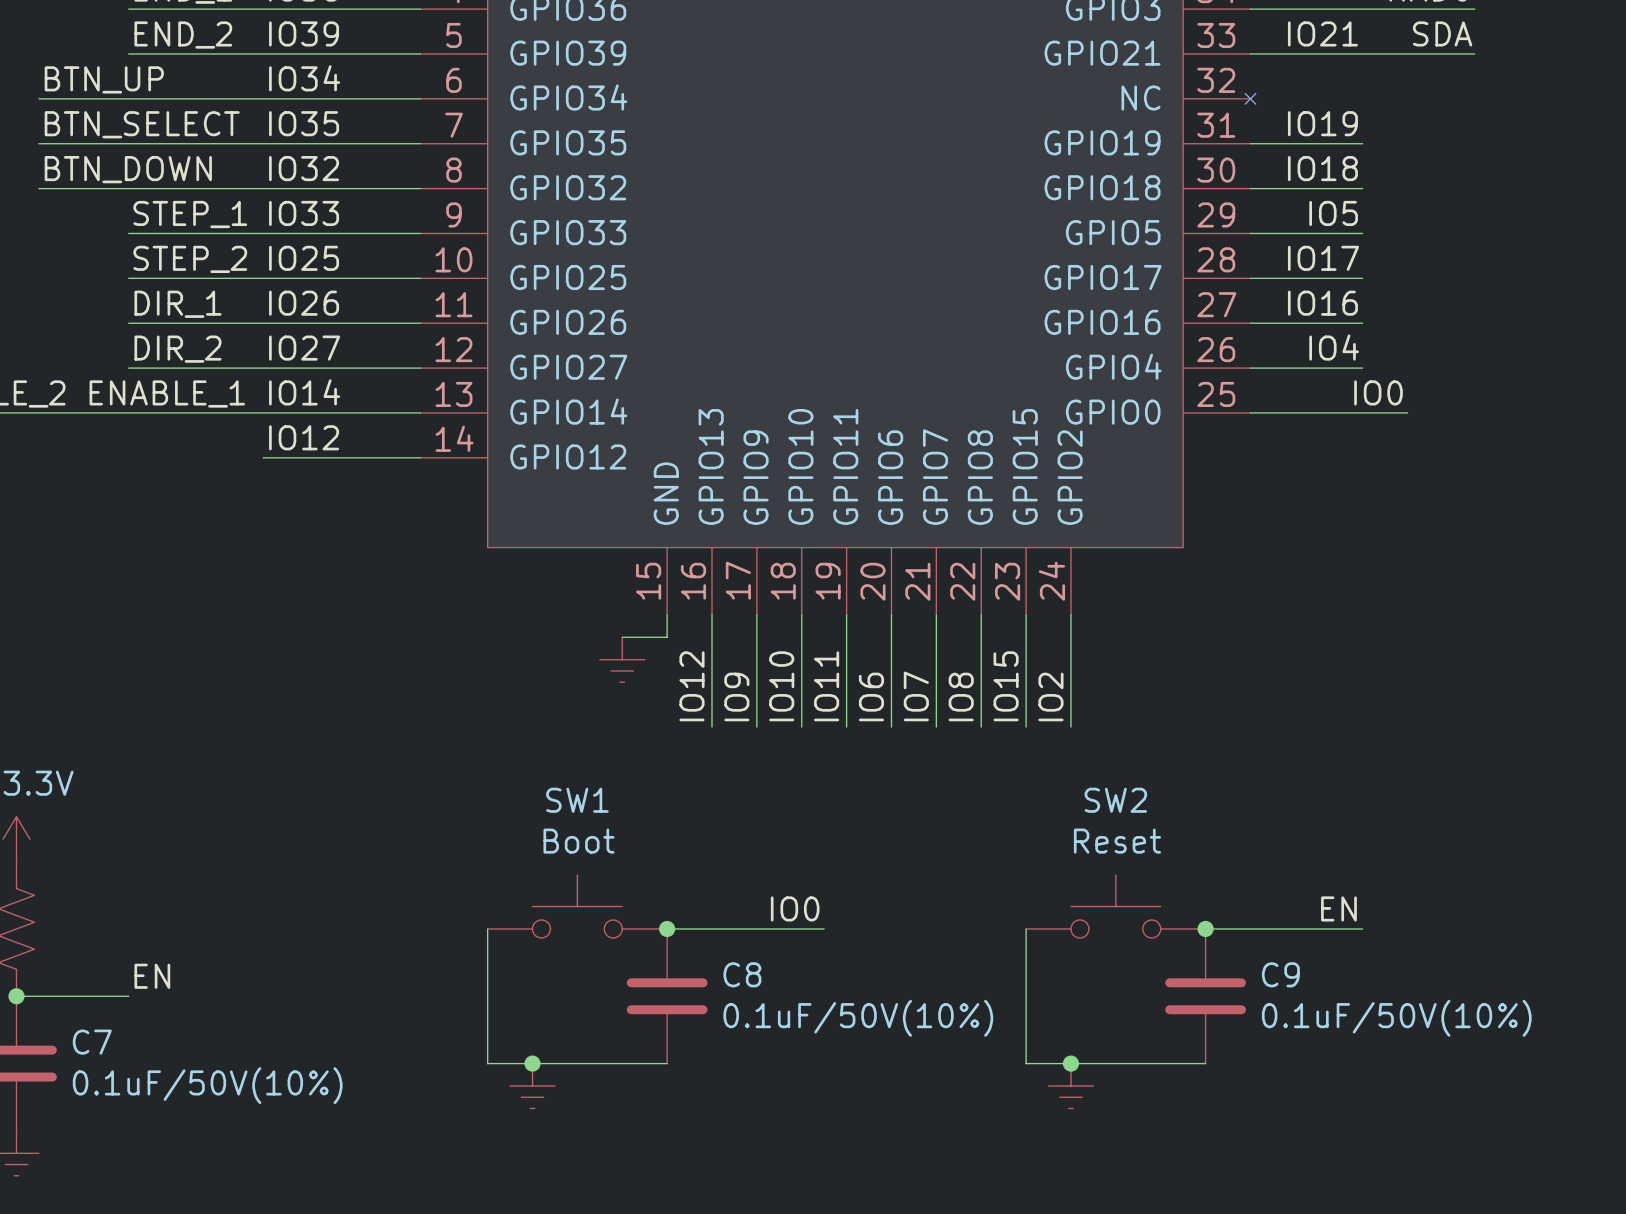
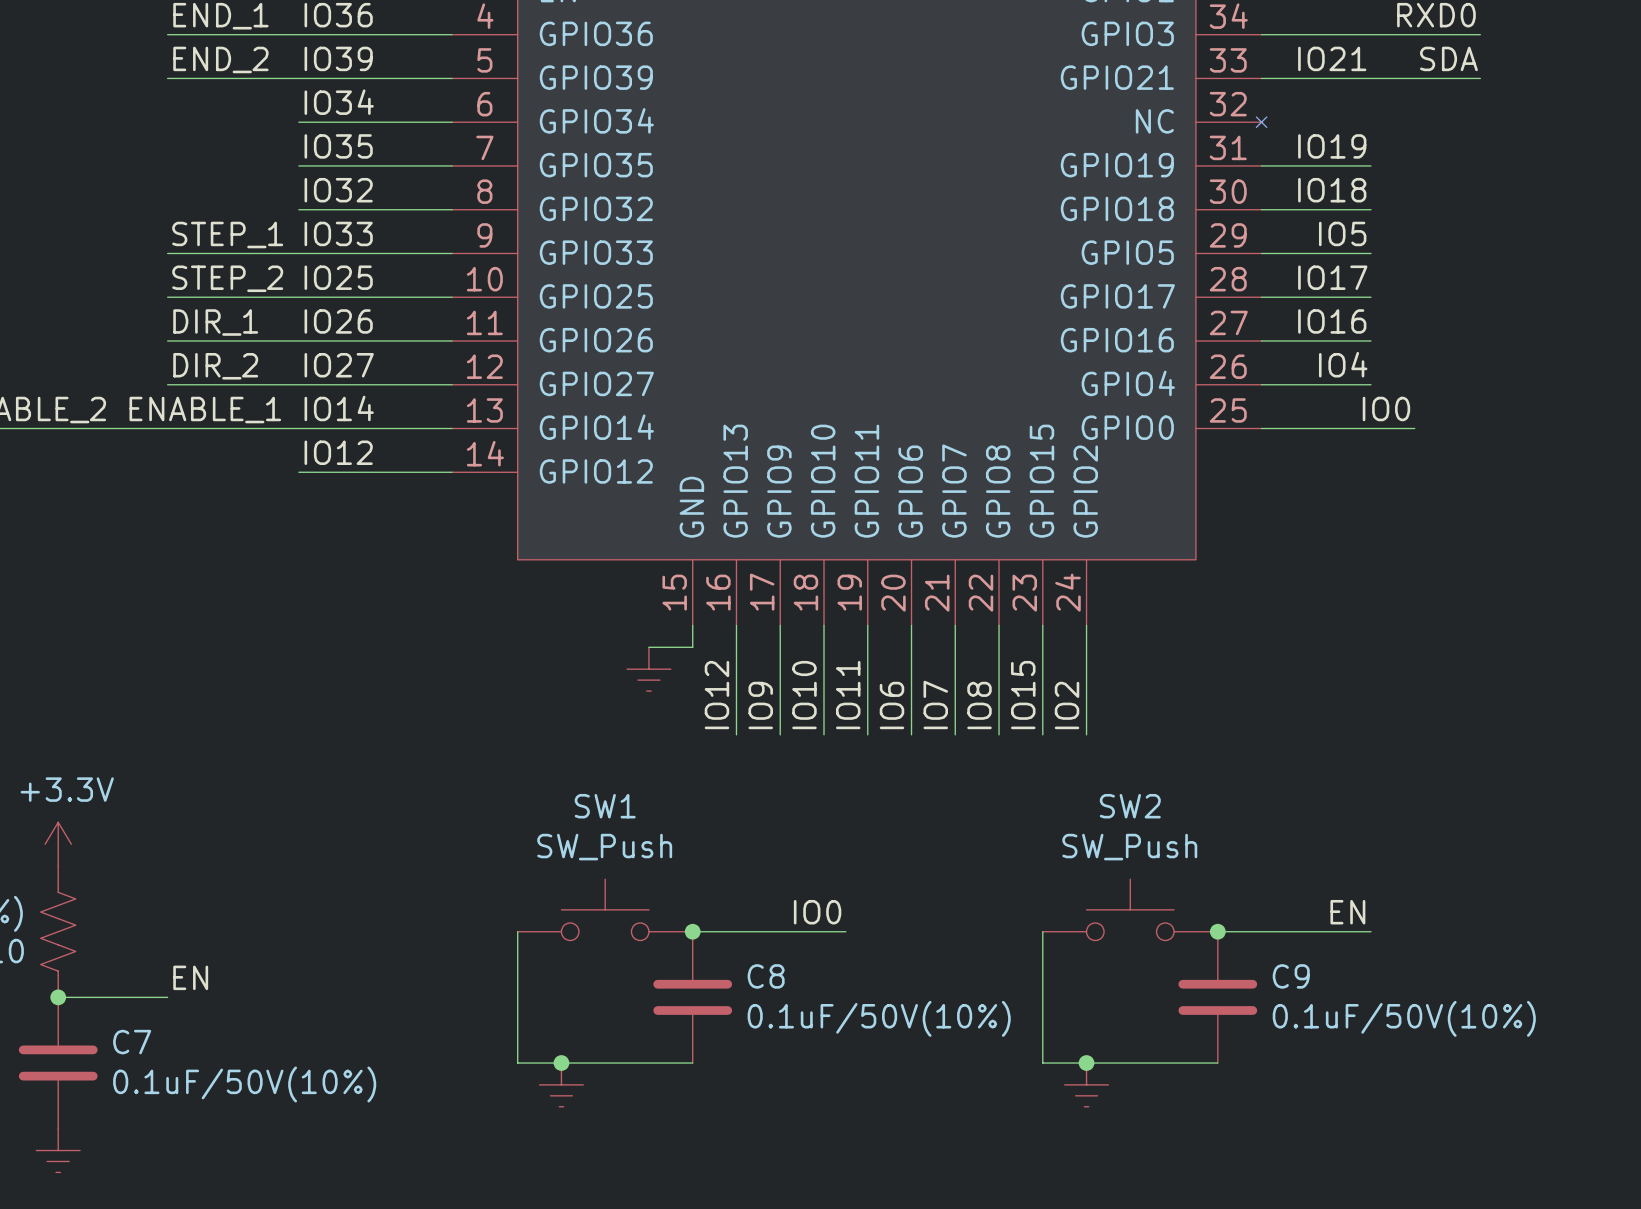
label: BTN_UP (104, 79) -> none
wire: (38, 98) (263, 98) -> none
label: BTN_SELECT (142, 124) -> none
wire: (38, 143) (263, 143) -> none
label: BTN_DOWN (128, 169) -> none
wire: (38, 188) (263, 188) -> none
SW1 value: Boot (578, 841) -> SW_Push (604, 847)
SW2 value: Reset (1117, 841) -> SW_Push (1129, 847)

